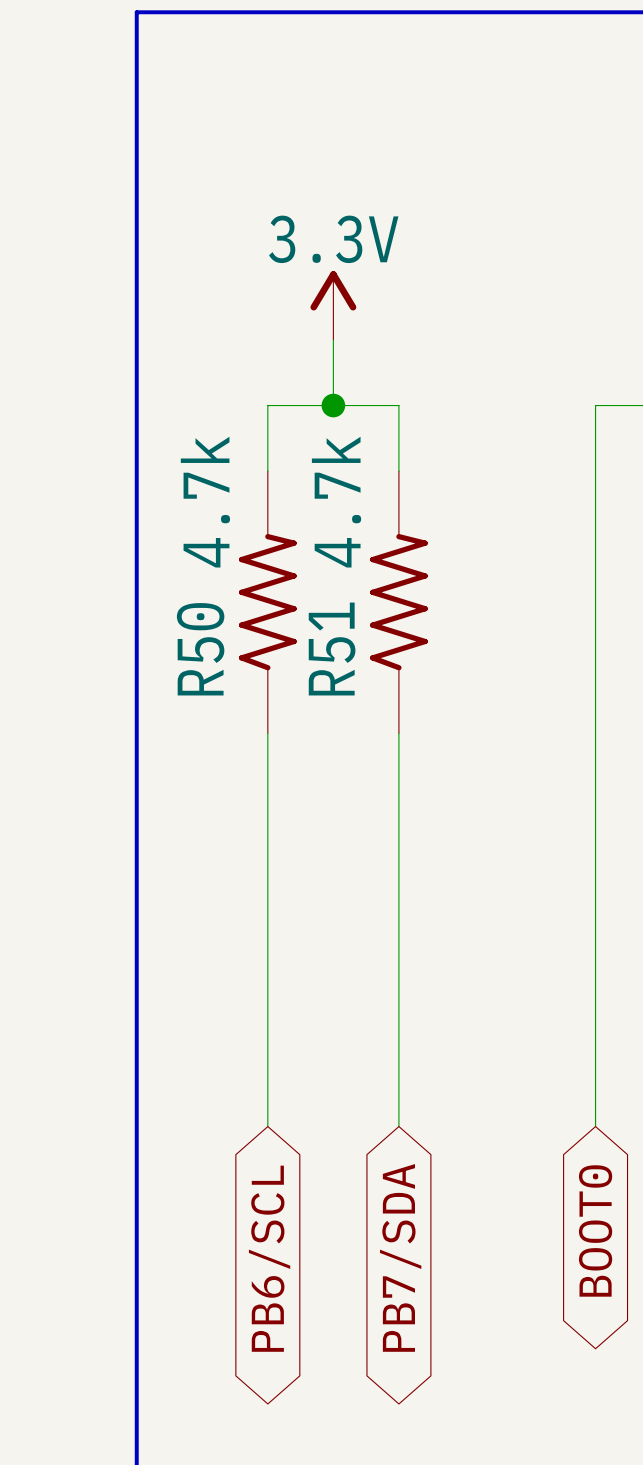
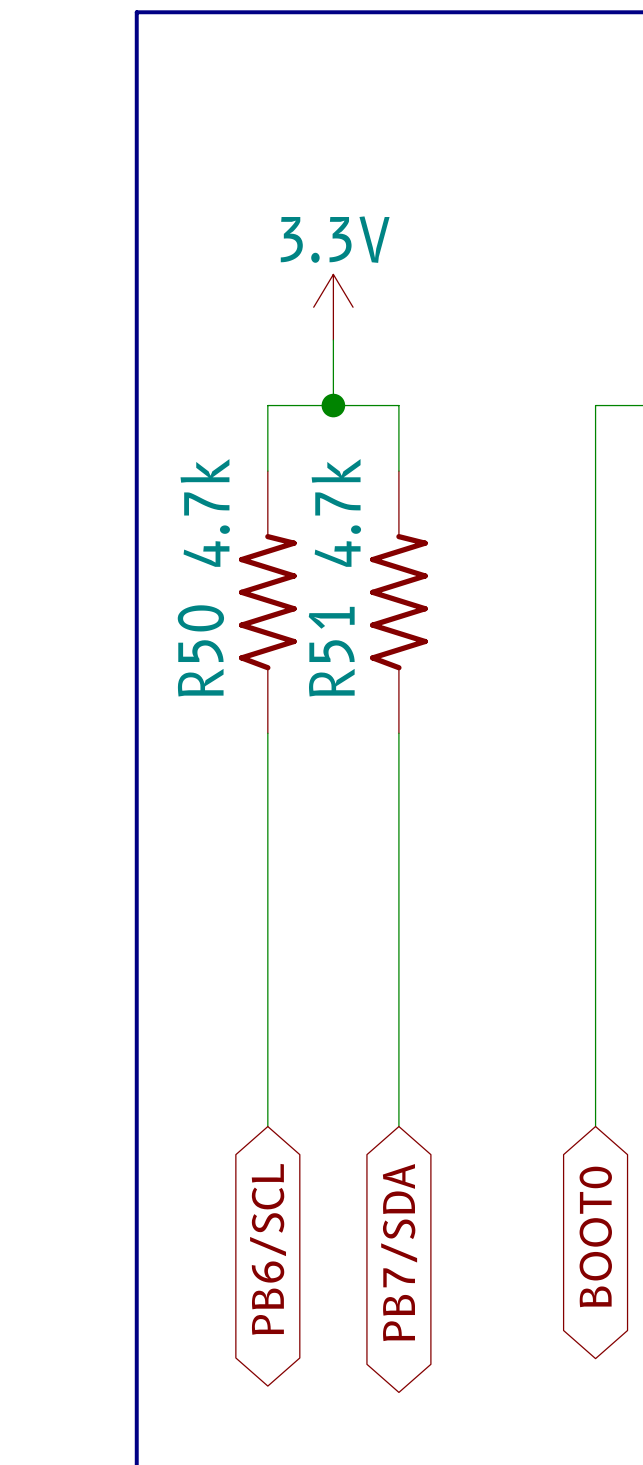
power symbol shape: [310, 271, 357, 341] -> [313, 274, 354, 341]

